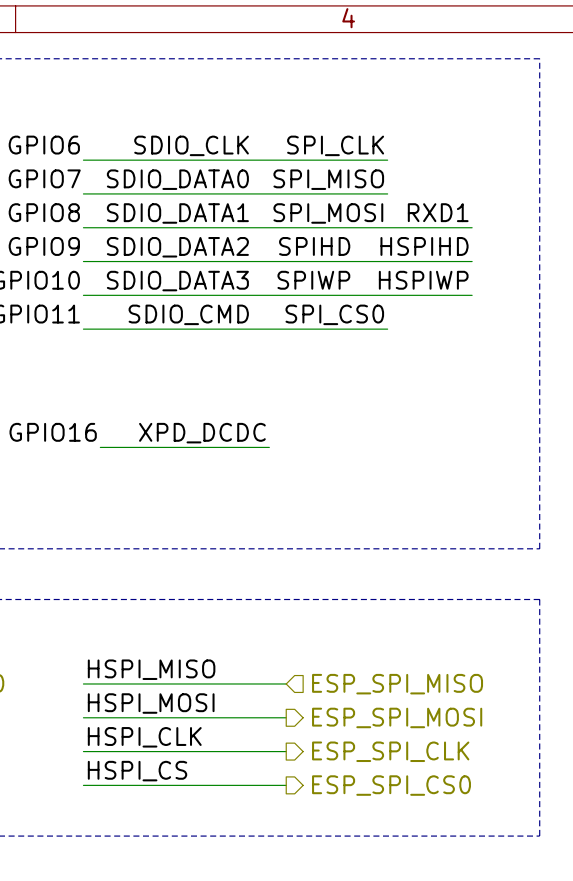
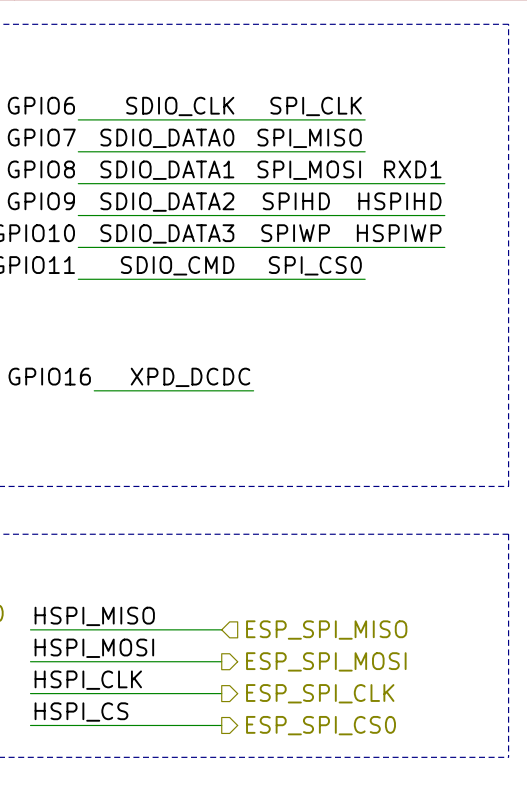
label position: HSPI_MISO (151, 669) -> HSPI_MISO (94, 616)
wire: (83, 683) (286, 683) -> (30, 629) (221, 629)
hierarchical label position: ESP_SPI_MISO (397, 684) -> ESP_SPI_MISO (326, 630)
label position: HSPI_MOSI (151, 703) -> HSPI_MOSI (94, 648)
wire: (83, 717) (286, 717) -> (30, 661) (221, 661)
hierarchical label position: ESP_SPI_MOSI (397, 717) -> ESP_SPI_MOSI (326, 661)
label position: HSPI_CLK (144, 737) -> HSPI_CLK (88, 680)
wire: (83, 751) (286, 751) -> (30, 693) (221, 693)
hierarchical label position: ESP_SPI_CLK (390, 751) -> ESP_SPI_CLK (320, 693)
label position: HSPI_CS (137, 771) -> HSPI_CS (81, 712)
wire: (83, 785) (286, 785) -> (30, 725) (221, 725)
hierarchical label position: ESP_SPI_CS0 (391, 785) -> ESP_SPI_CS0 (321, 725)

